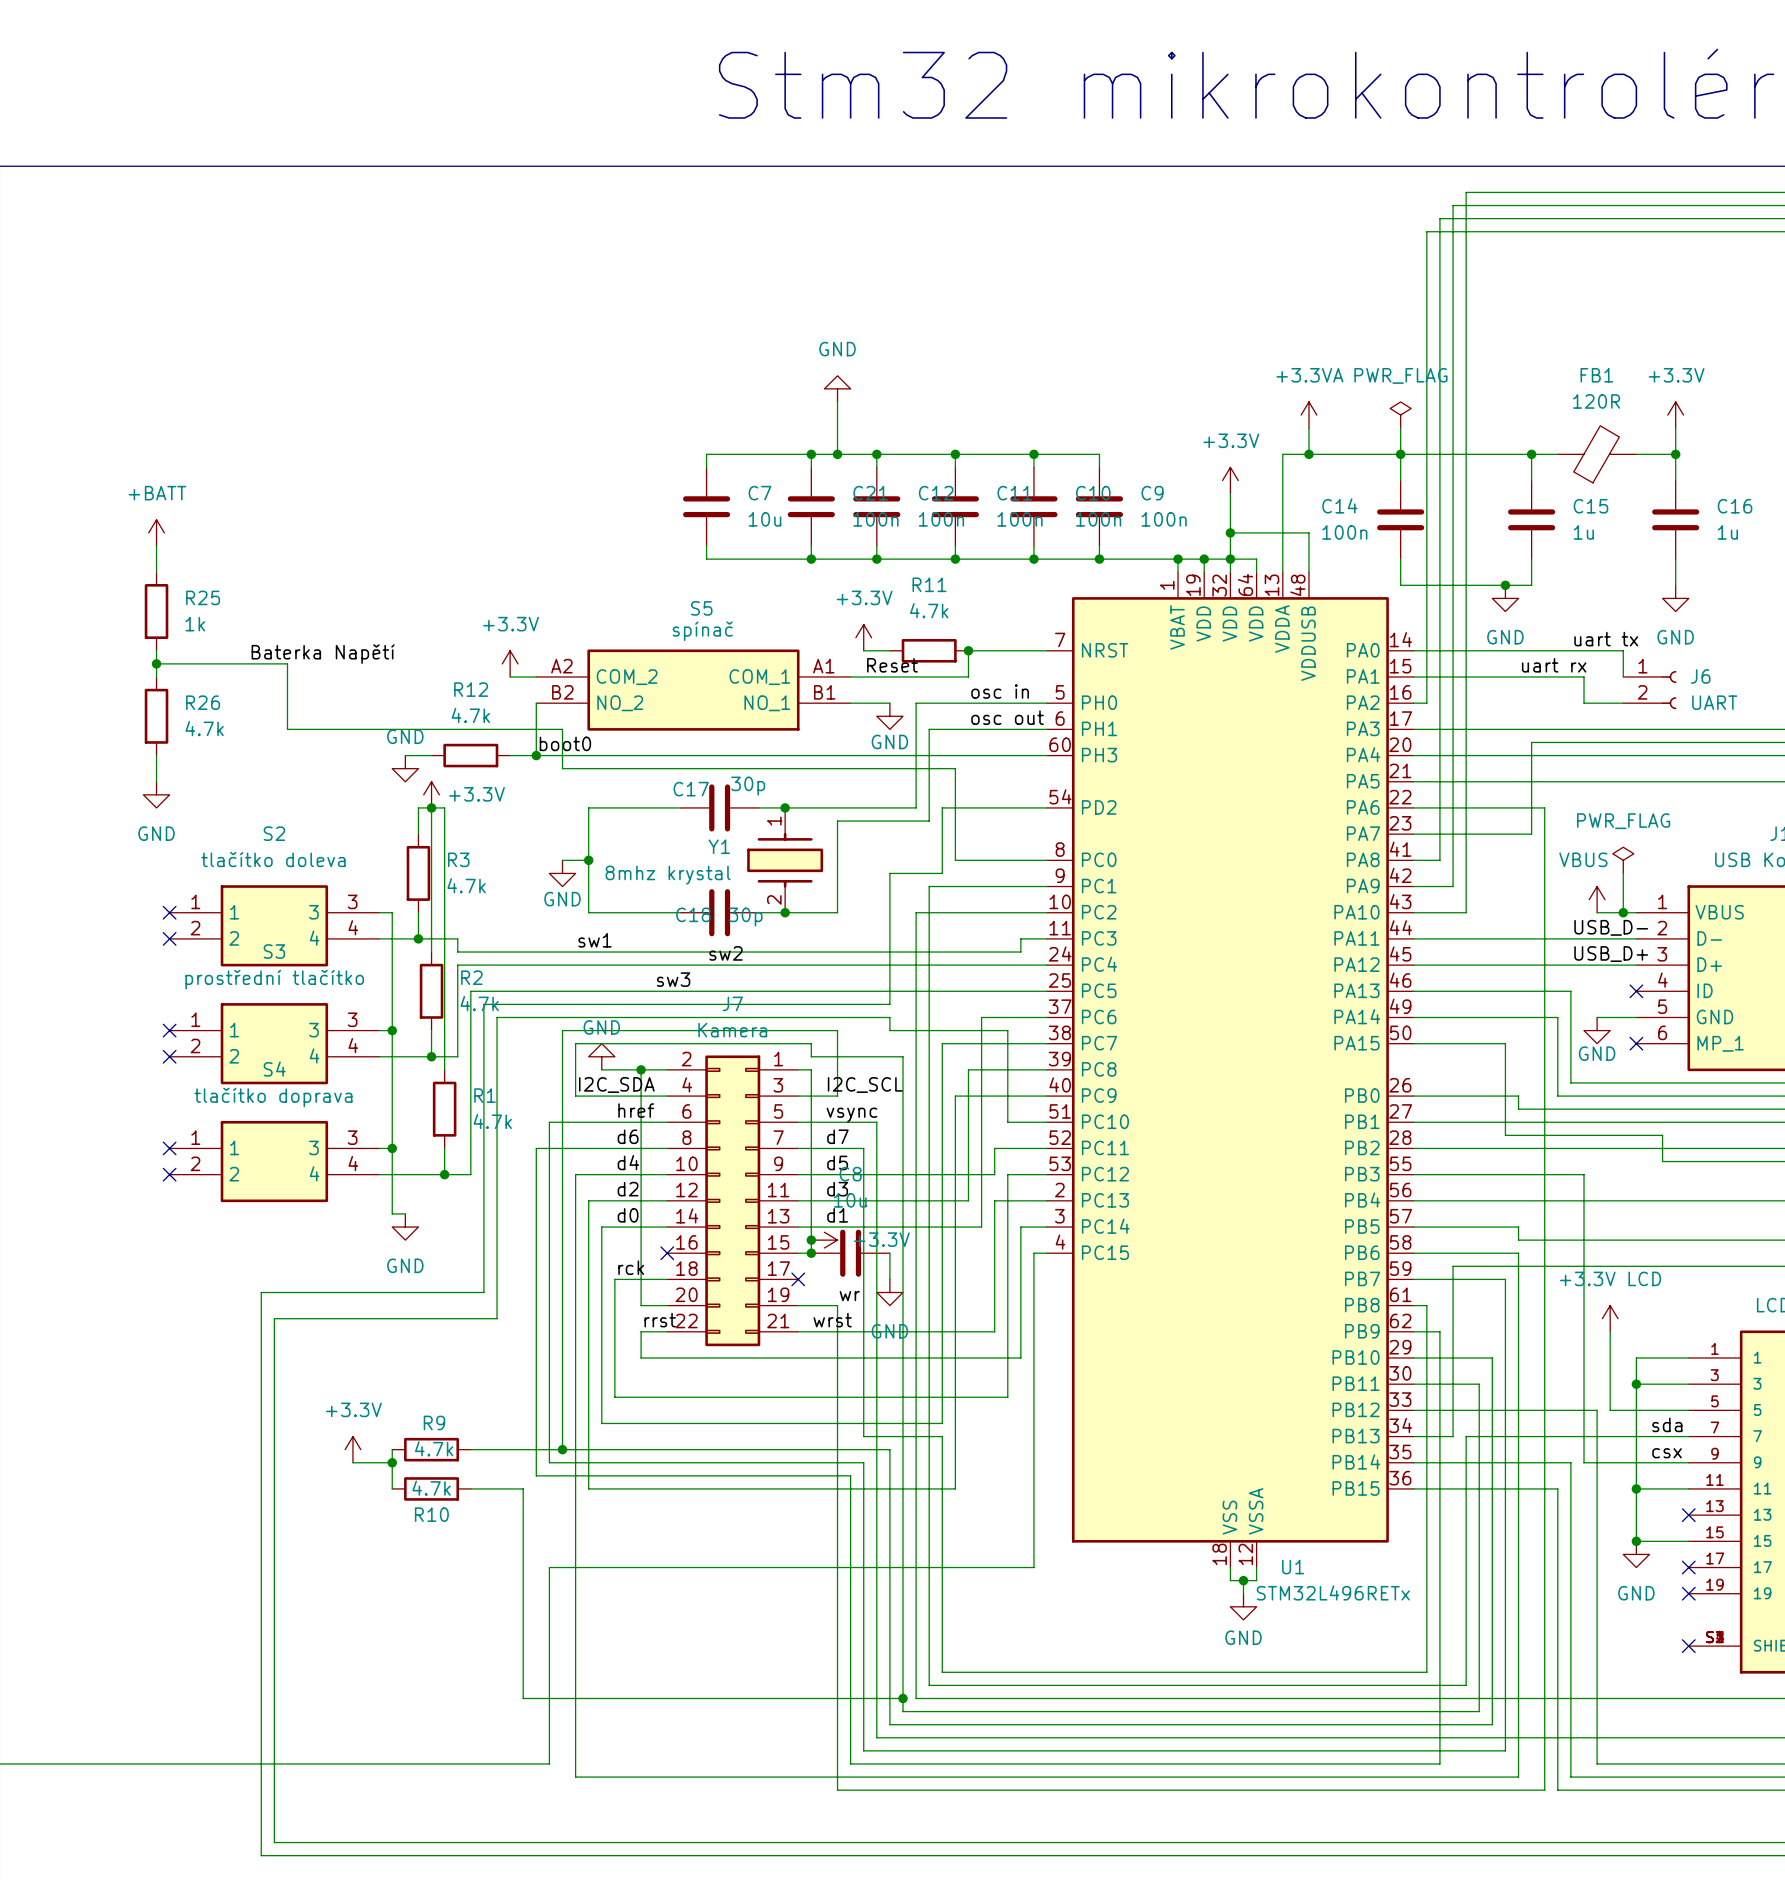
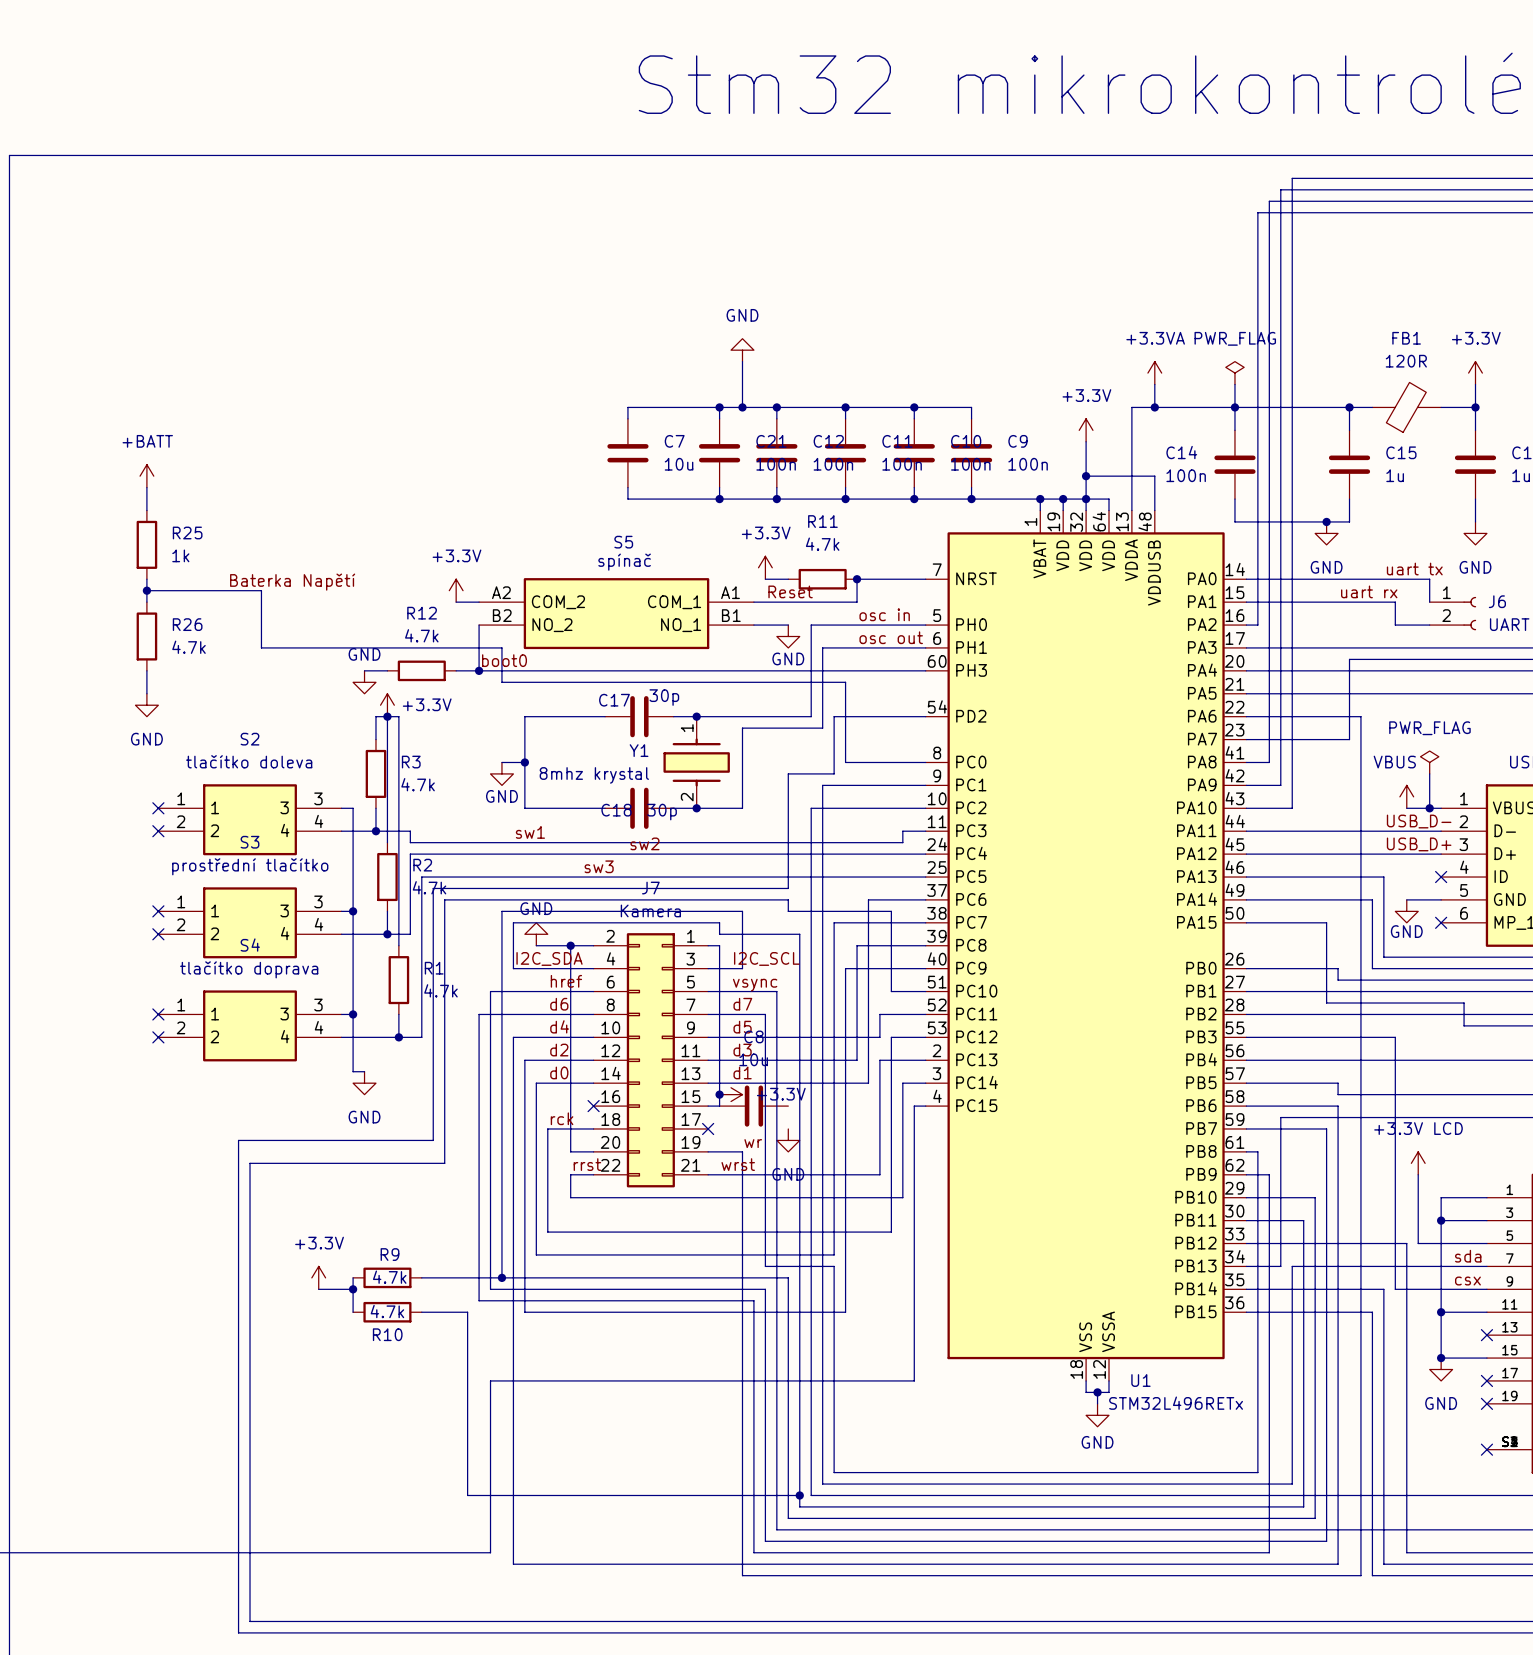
junction: (811, 1253) -> none
wire: (889, 1253) (889, 1279) -> none

